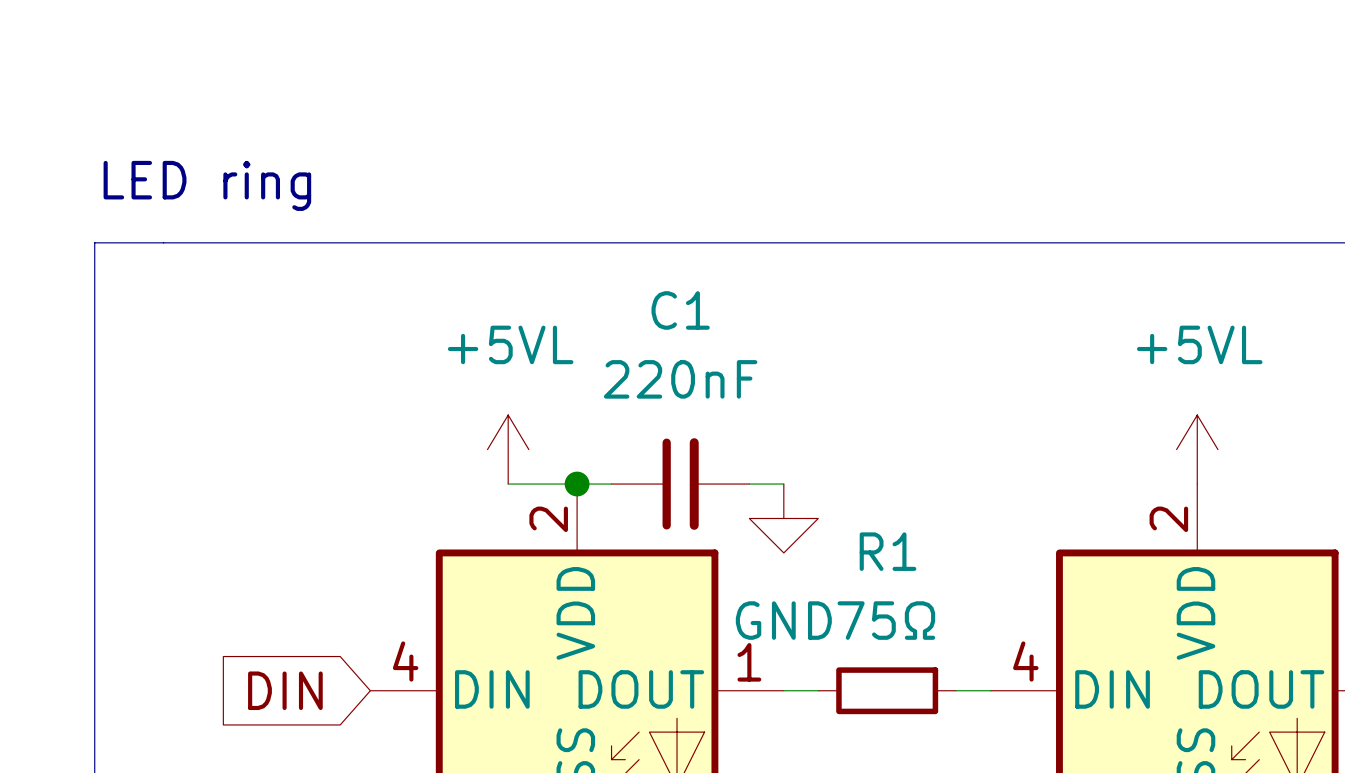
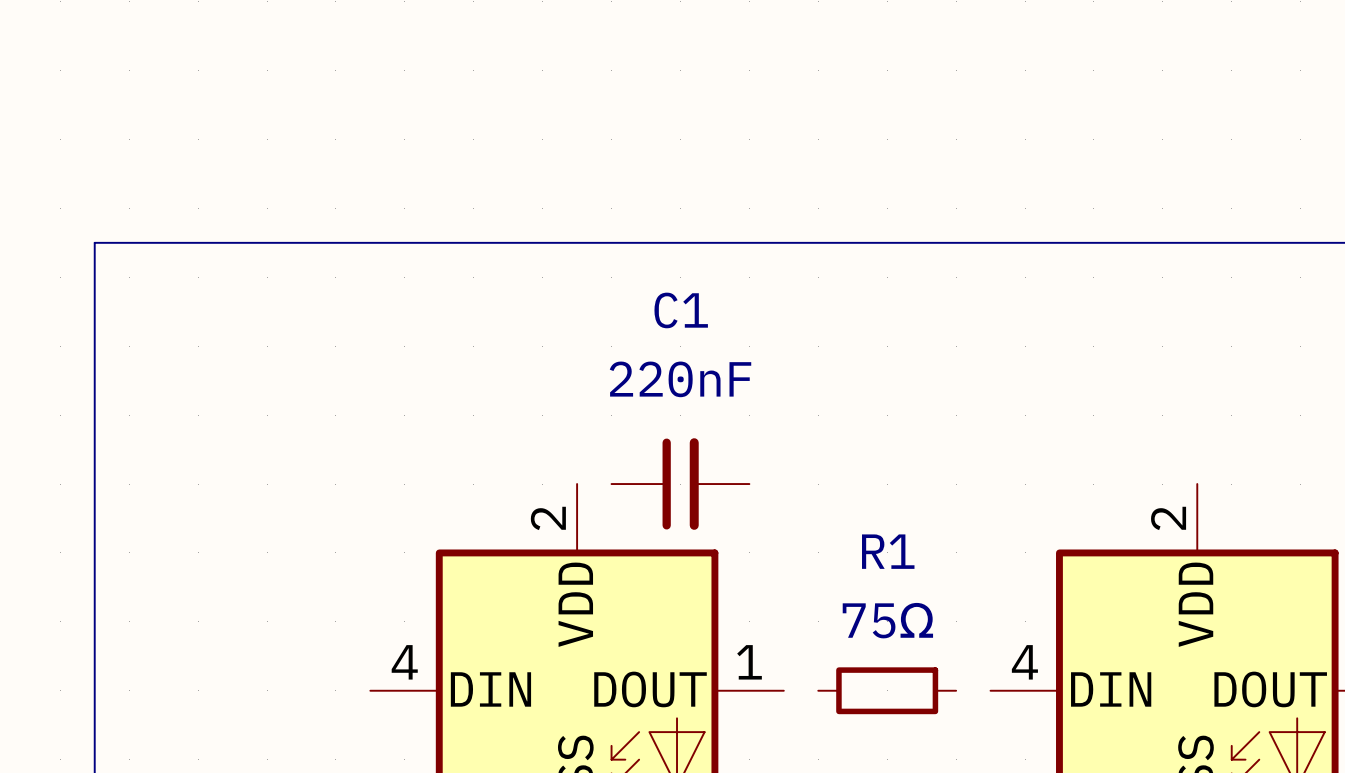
text: LED ring (207, 185) -> none
power symbol: +5VL (508, 449) -> none
power symbol: +5VL (1197, 449) -> none
wire: (508, 484) (611, 484) -> none
junction: (577, 484) -> none
wire: (749, 484) (783, 484) -> none
power symbol: GND (783, 518) -> none
global label: DIN (285, 690) -> none
wire: (783, 690) (818, 690) -> none
wire: (956, 690) (990, 690) -> none

